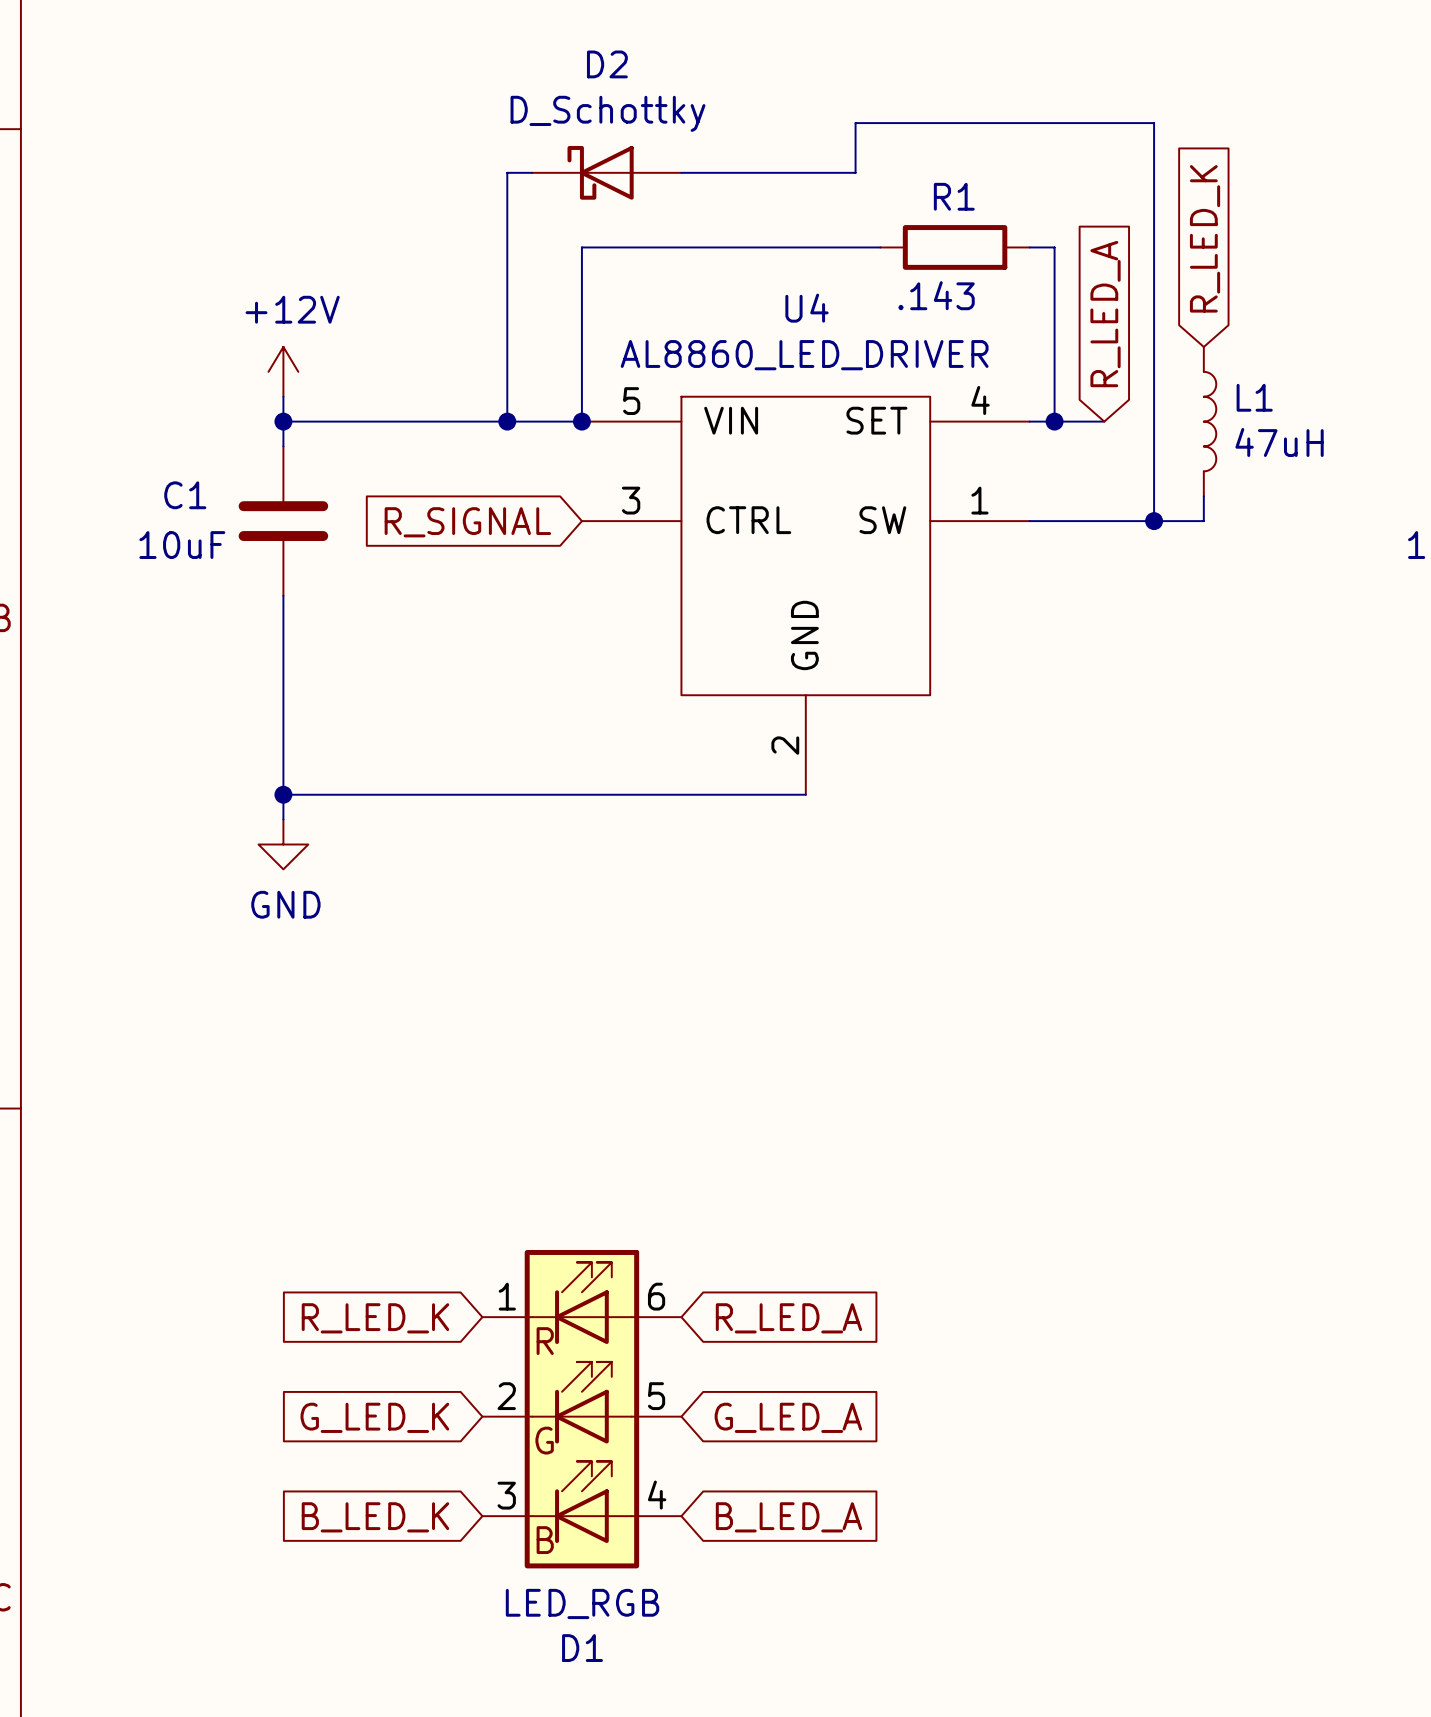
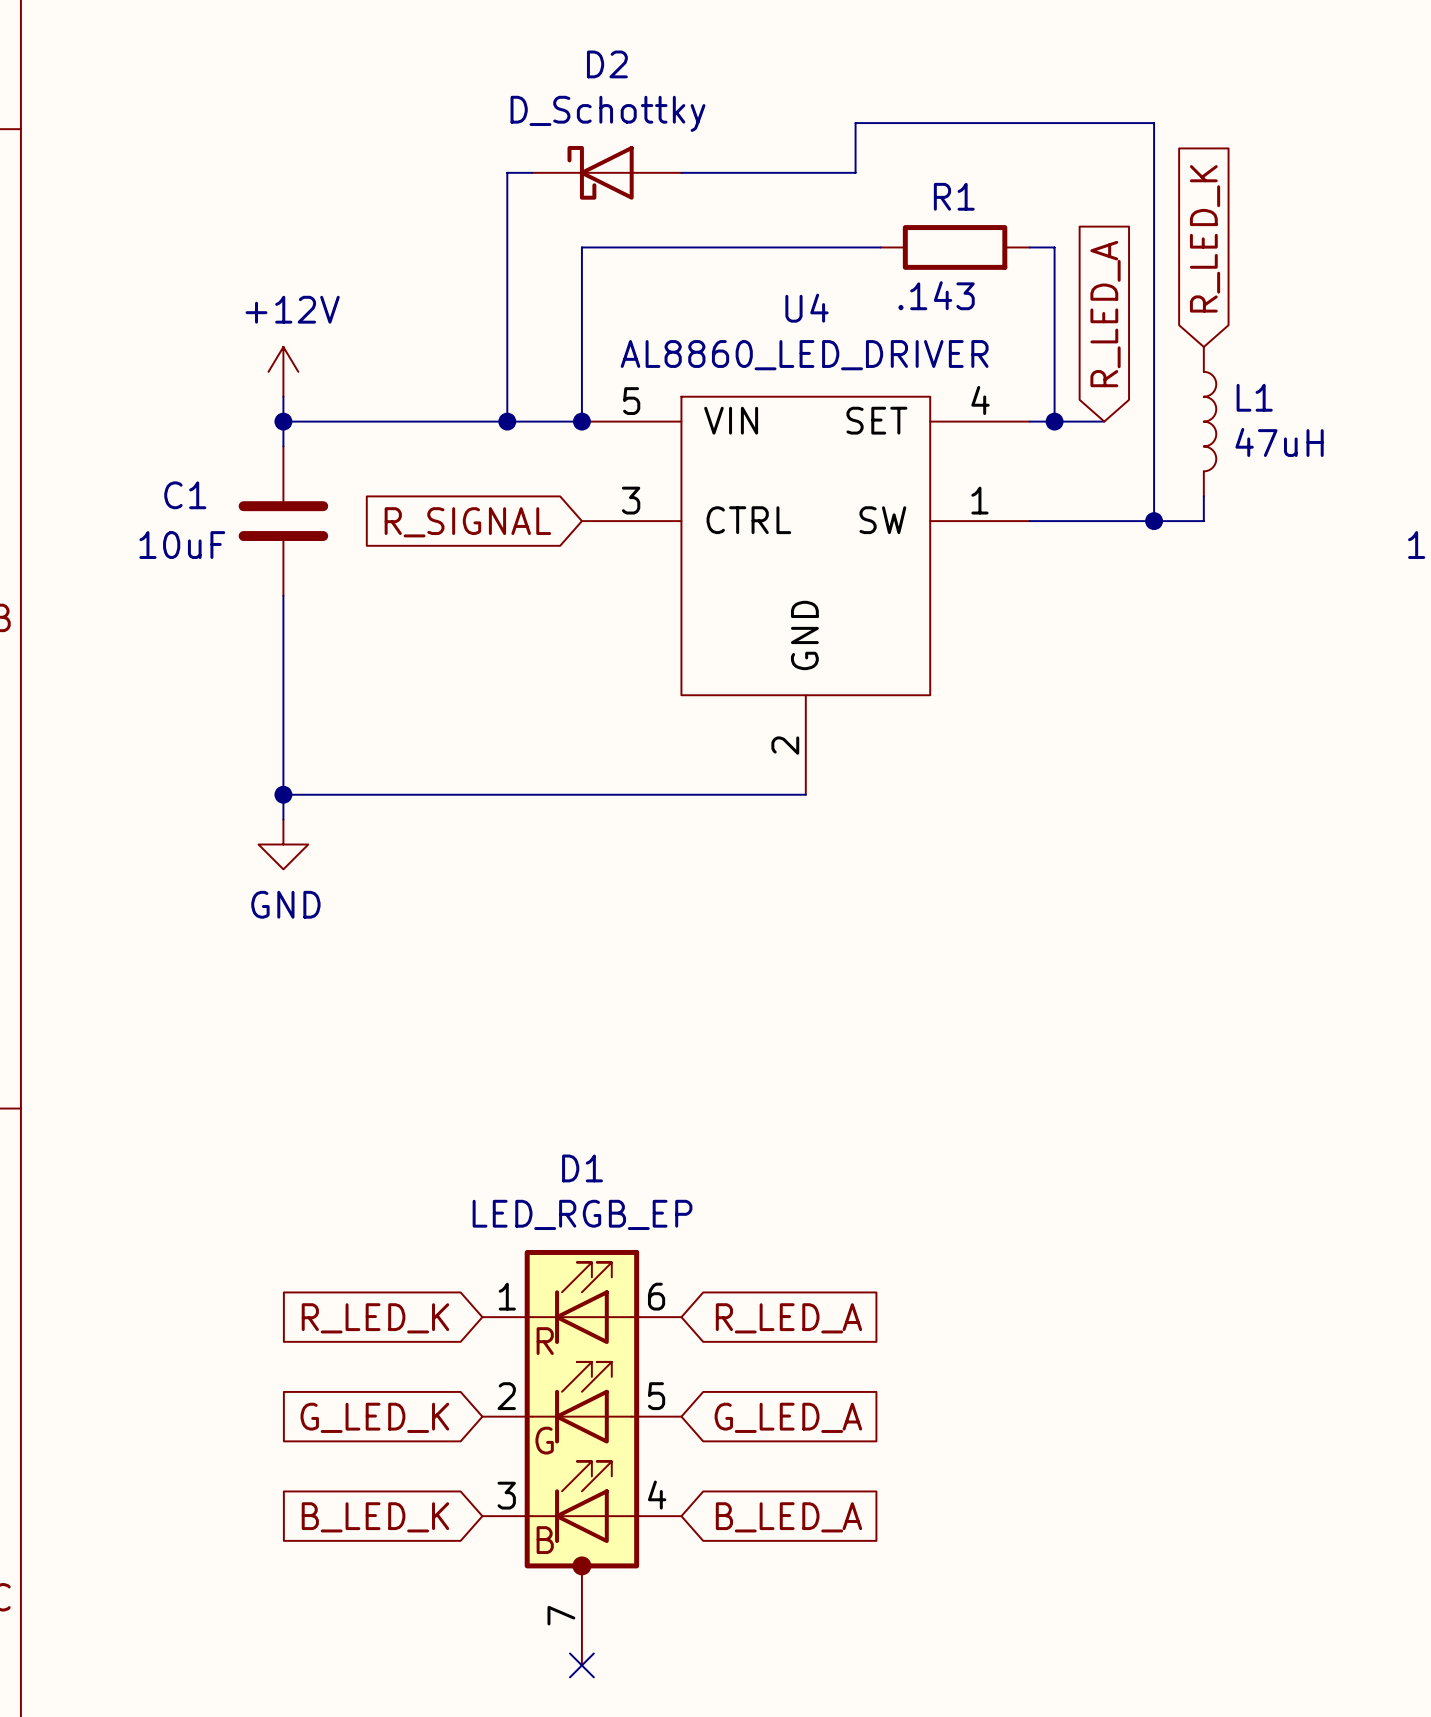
D1 symbol: [482, 1249, 682, 1569] -> [482, 1249, 682, 1666]
D1 value: LED_RGB (582, 1603) -> LED_RGB_EP (582, 1214)
D1 name position: D1 (582, 1648) -> D1 (582, 1168)
no-connect mark: none -> (581, 1665)

